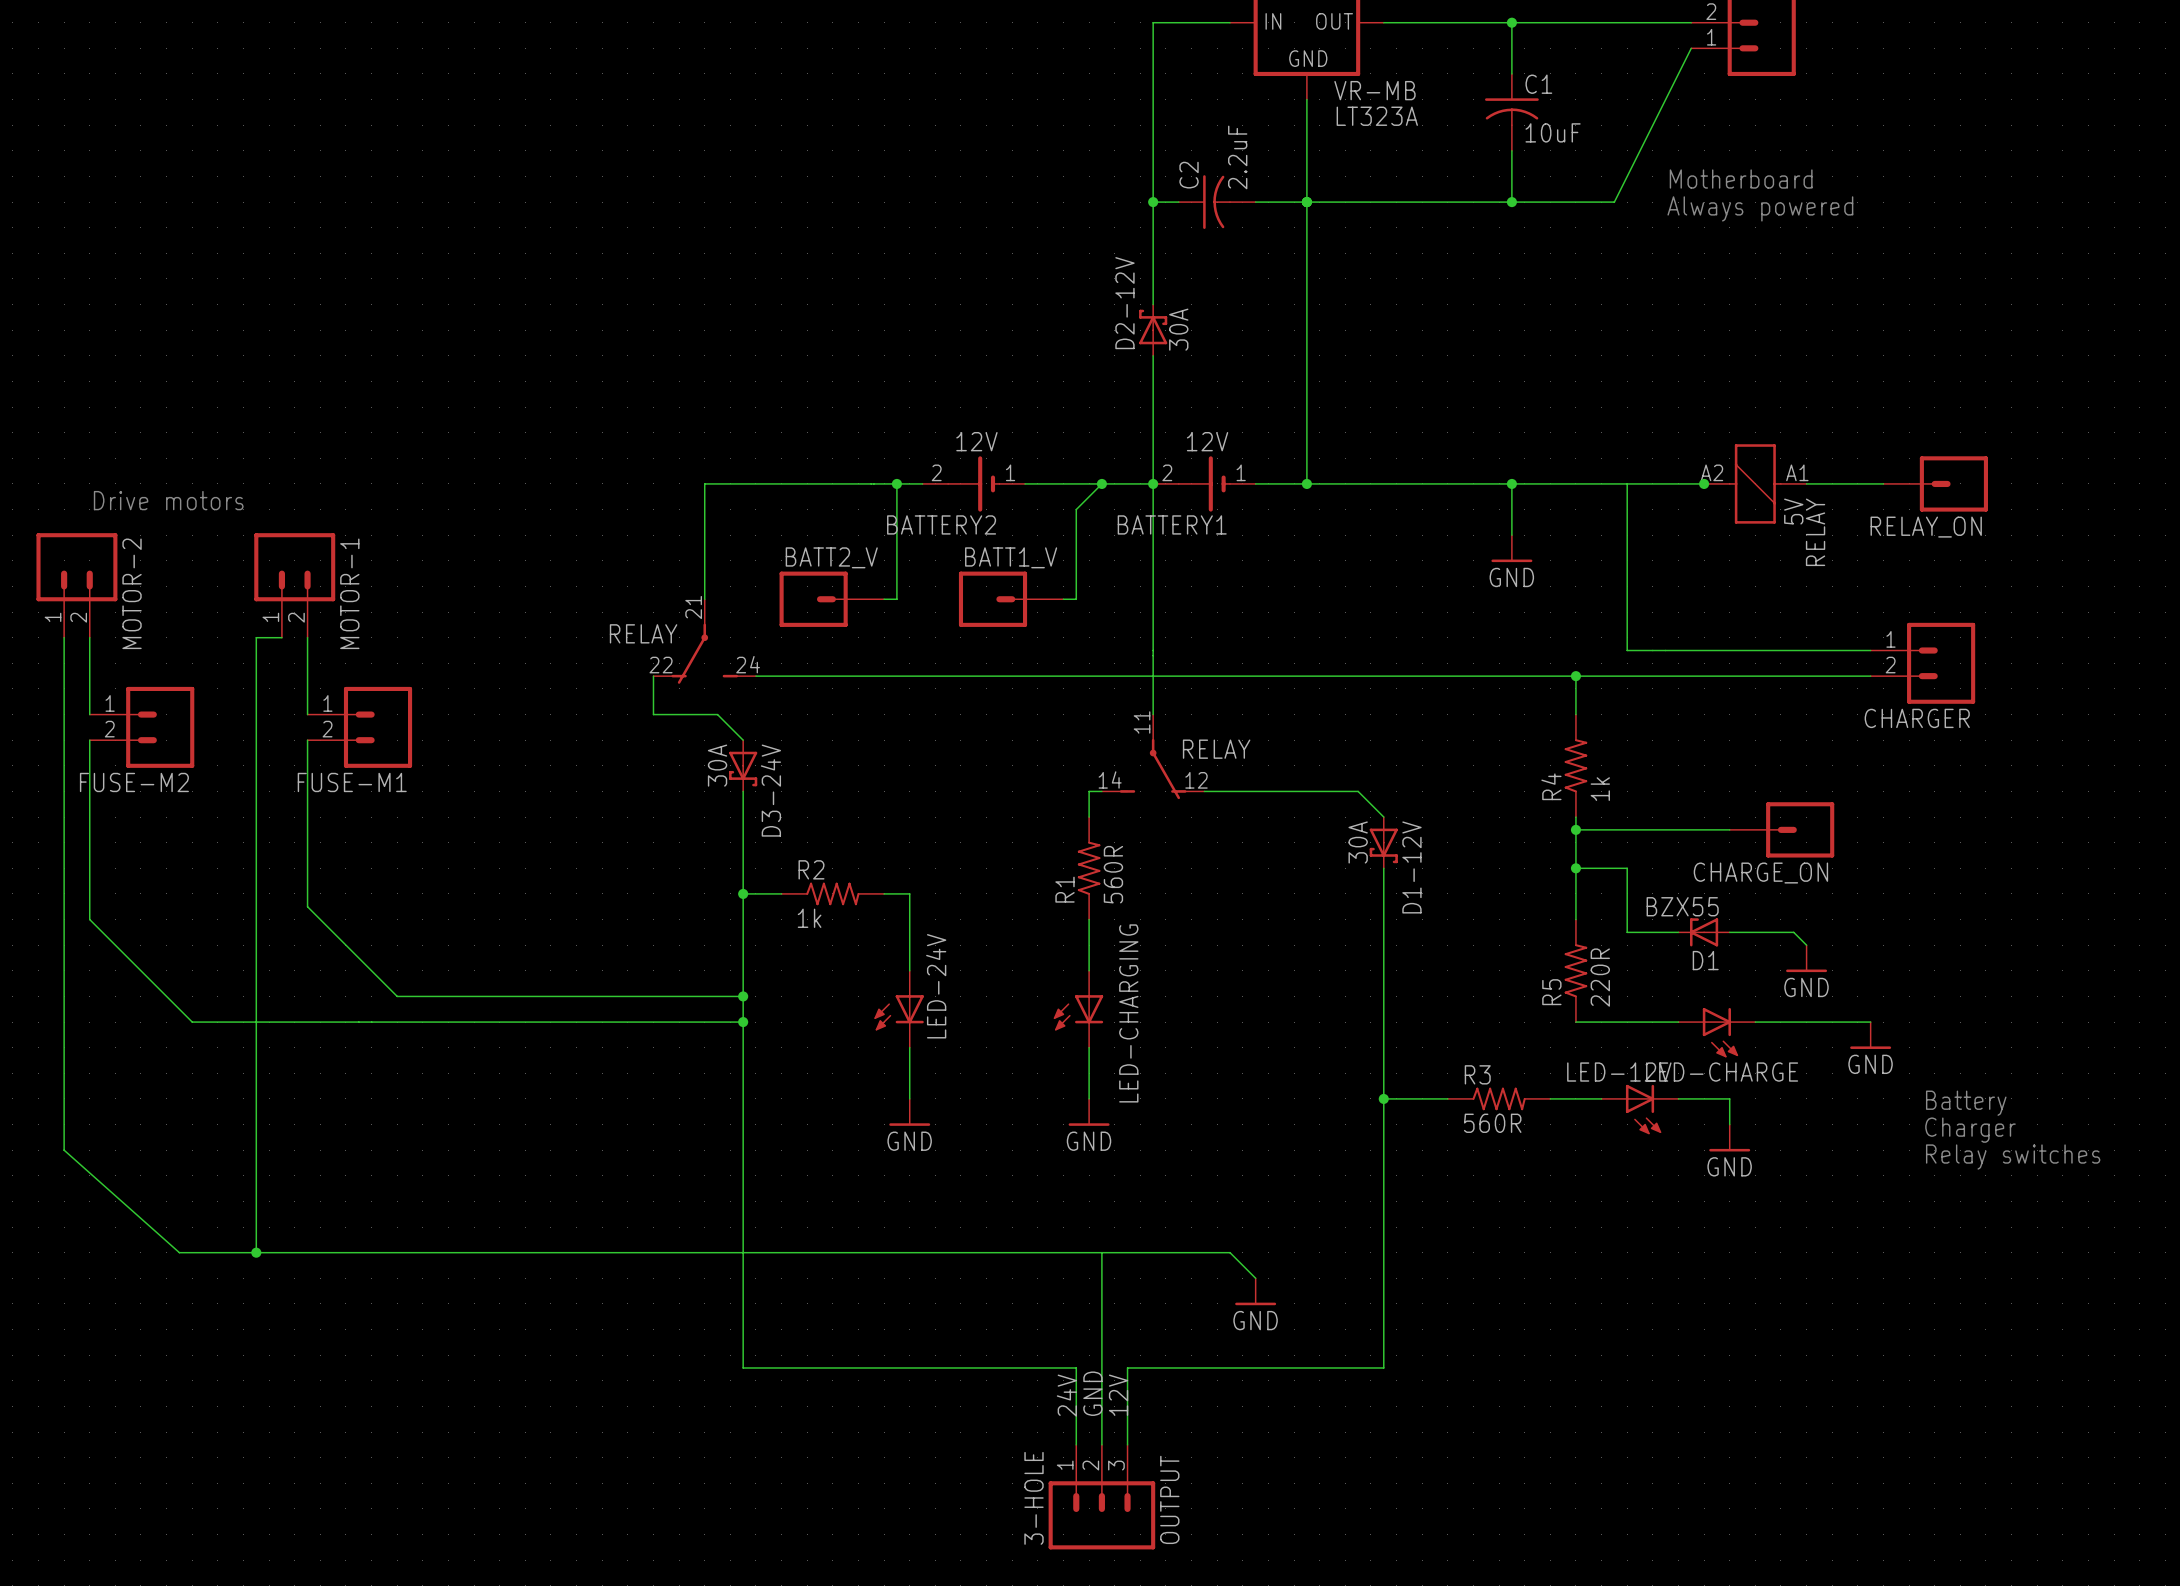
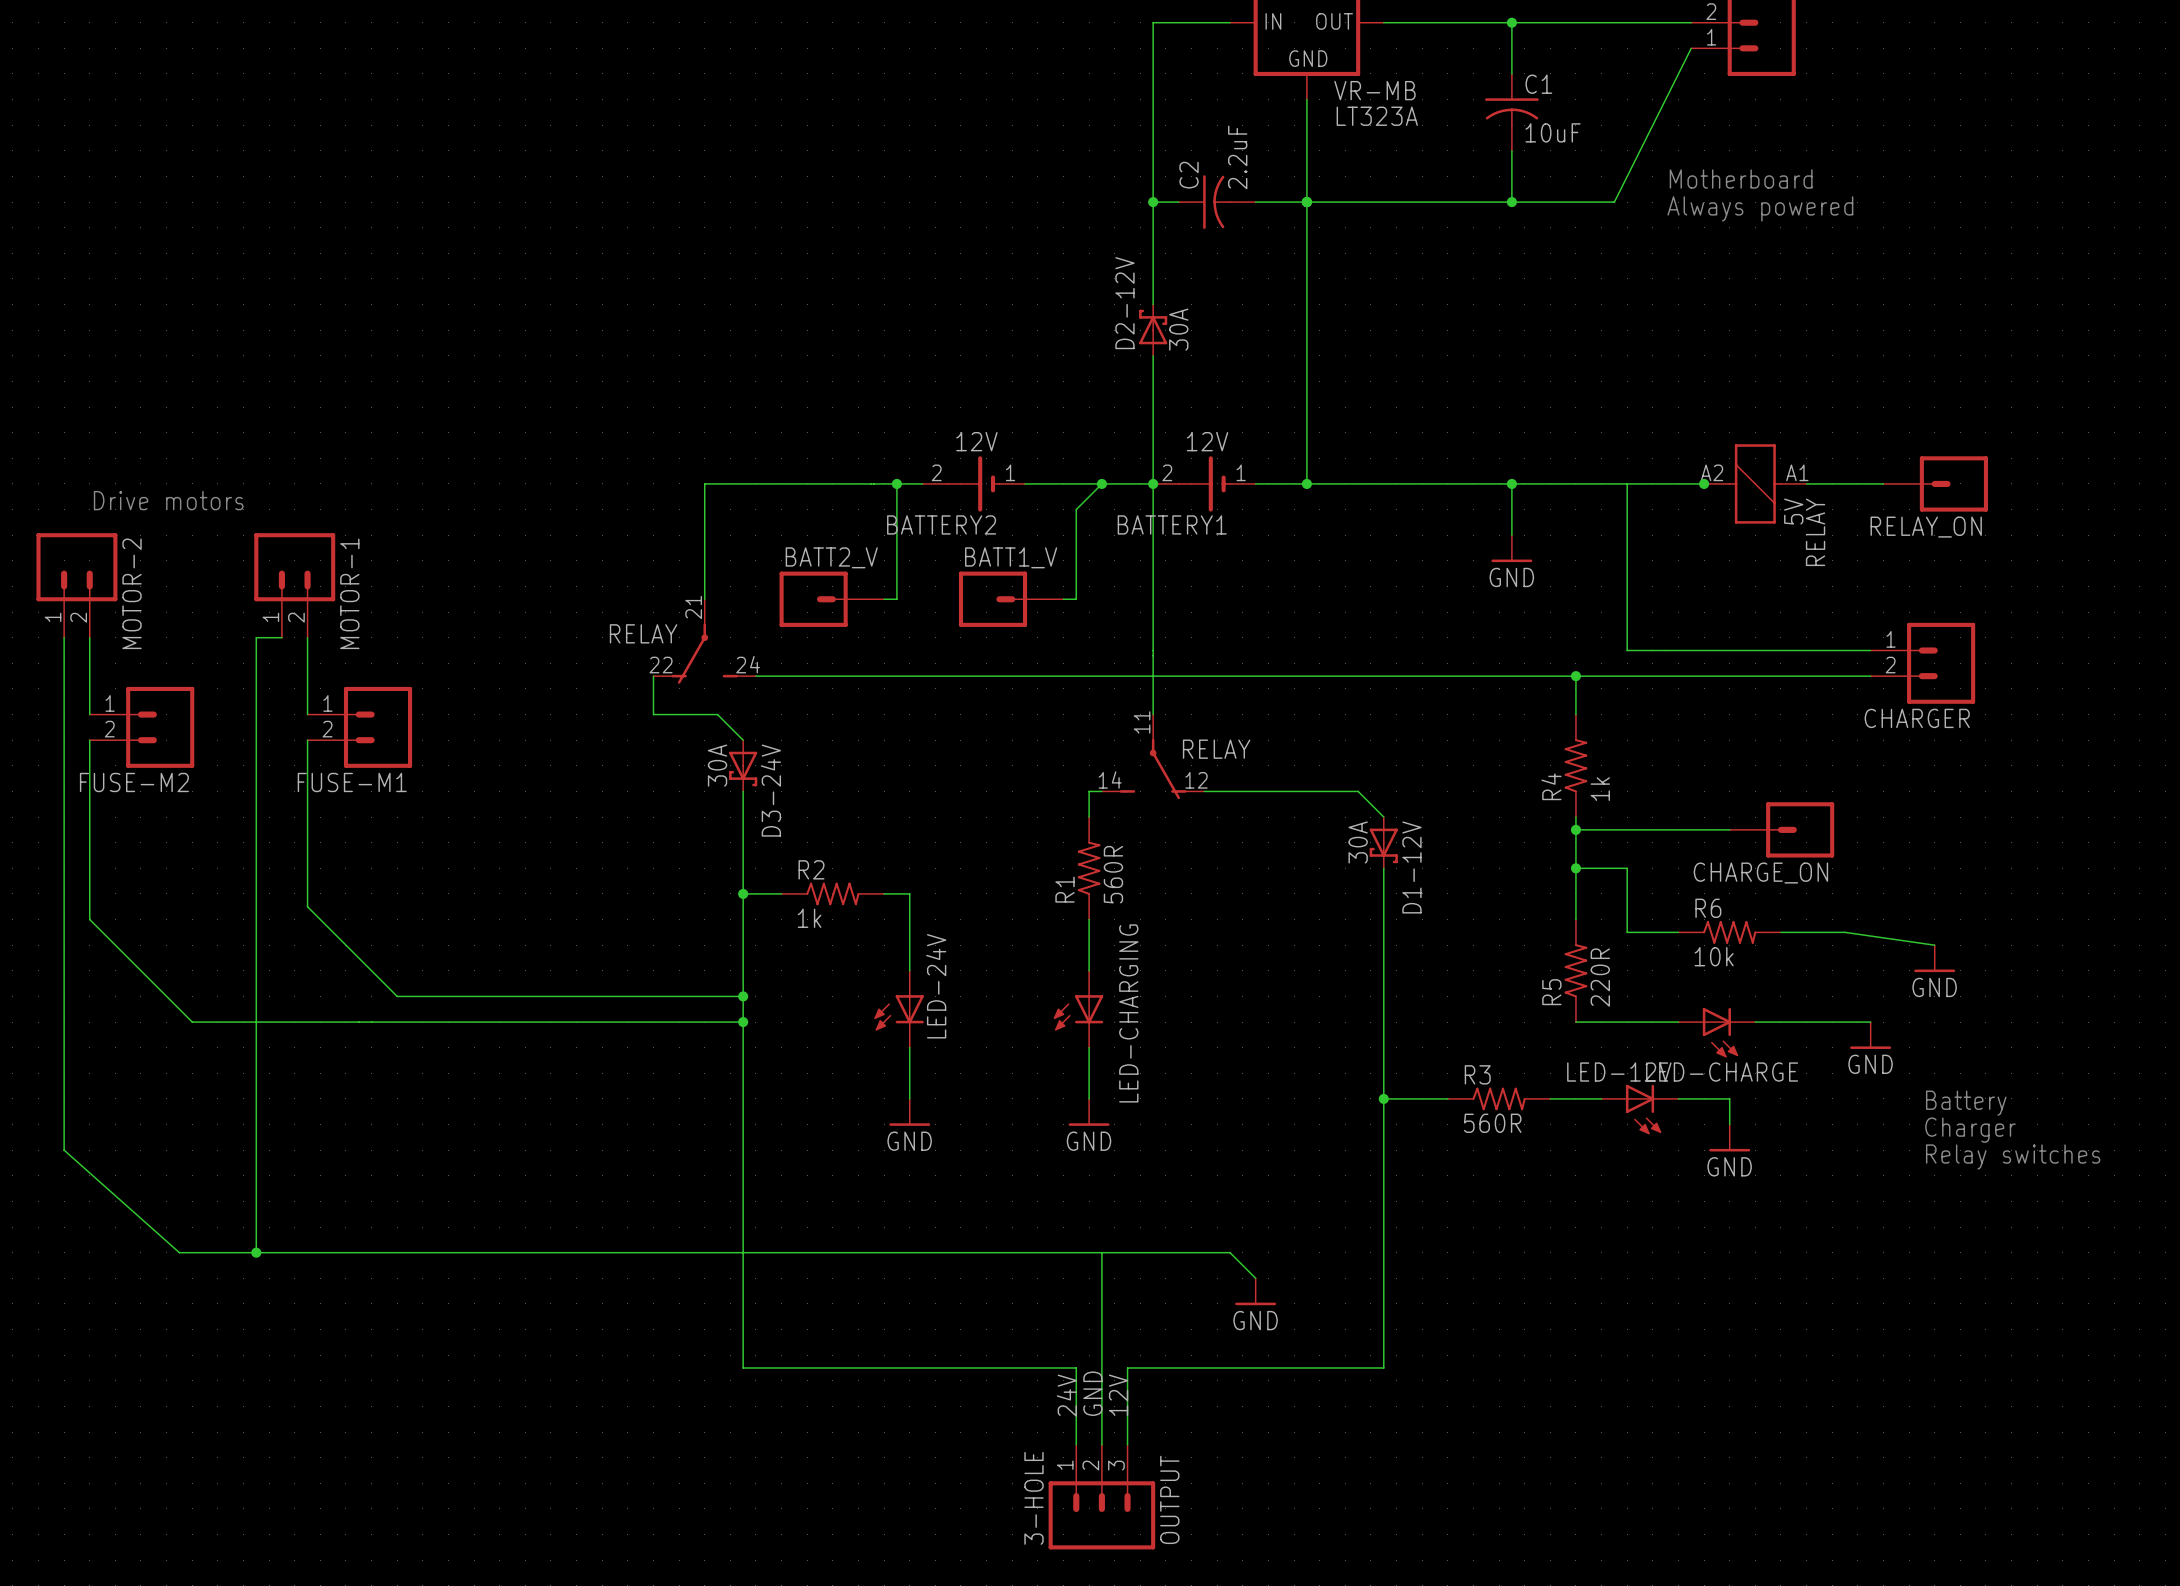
D1: BZX55 (1704, 932) -> none
R6: none -> 10k (1729, 932)
wire: (1793, 932) (1806, 945) -> (1793, 932) (1845, 932) (1934, 945)
power symbol position: GND (1806, 958) -> GND (1934, 958)

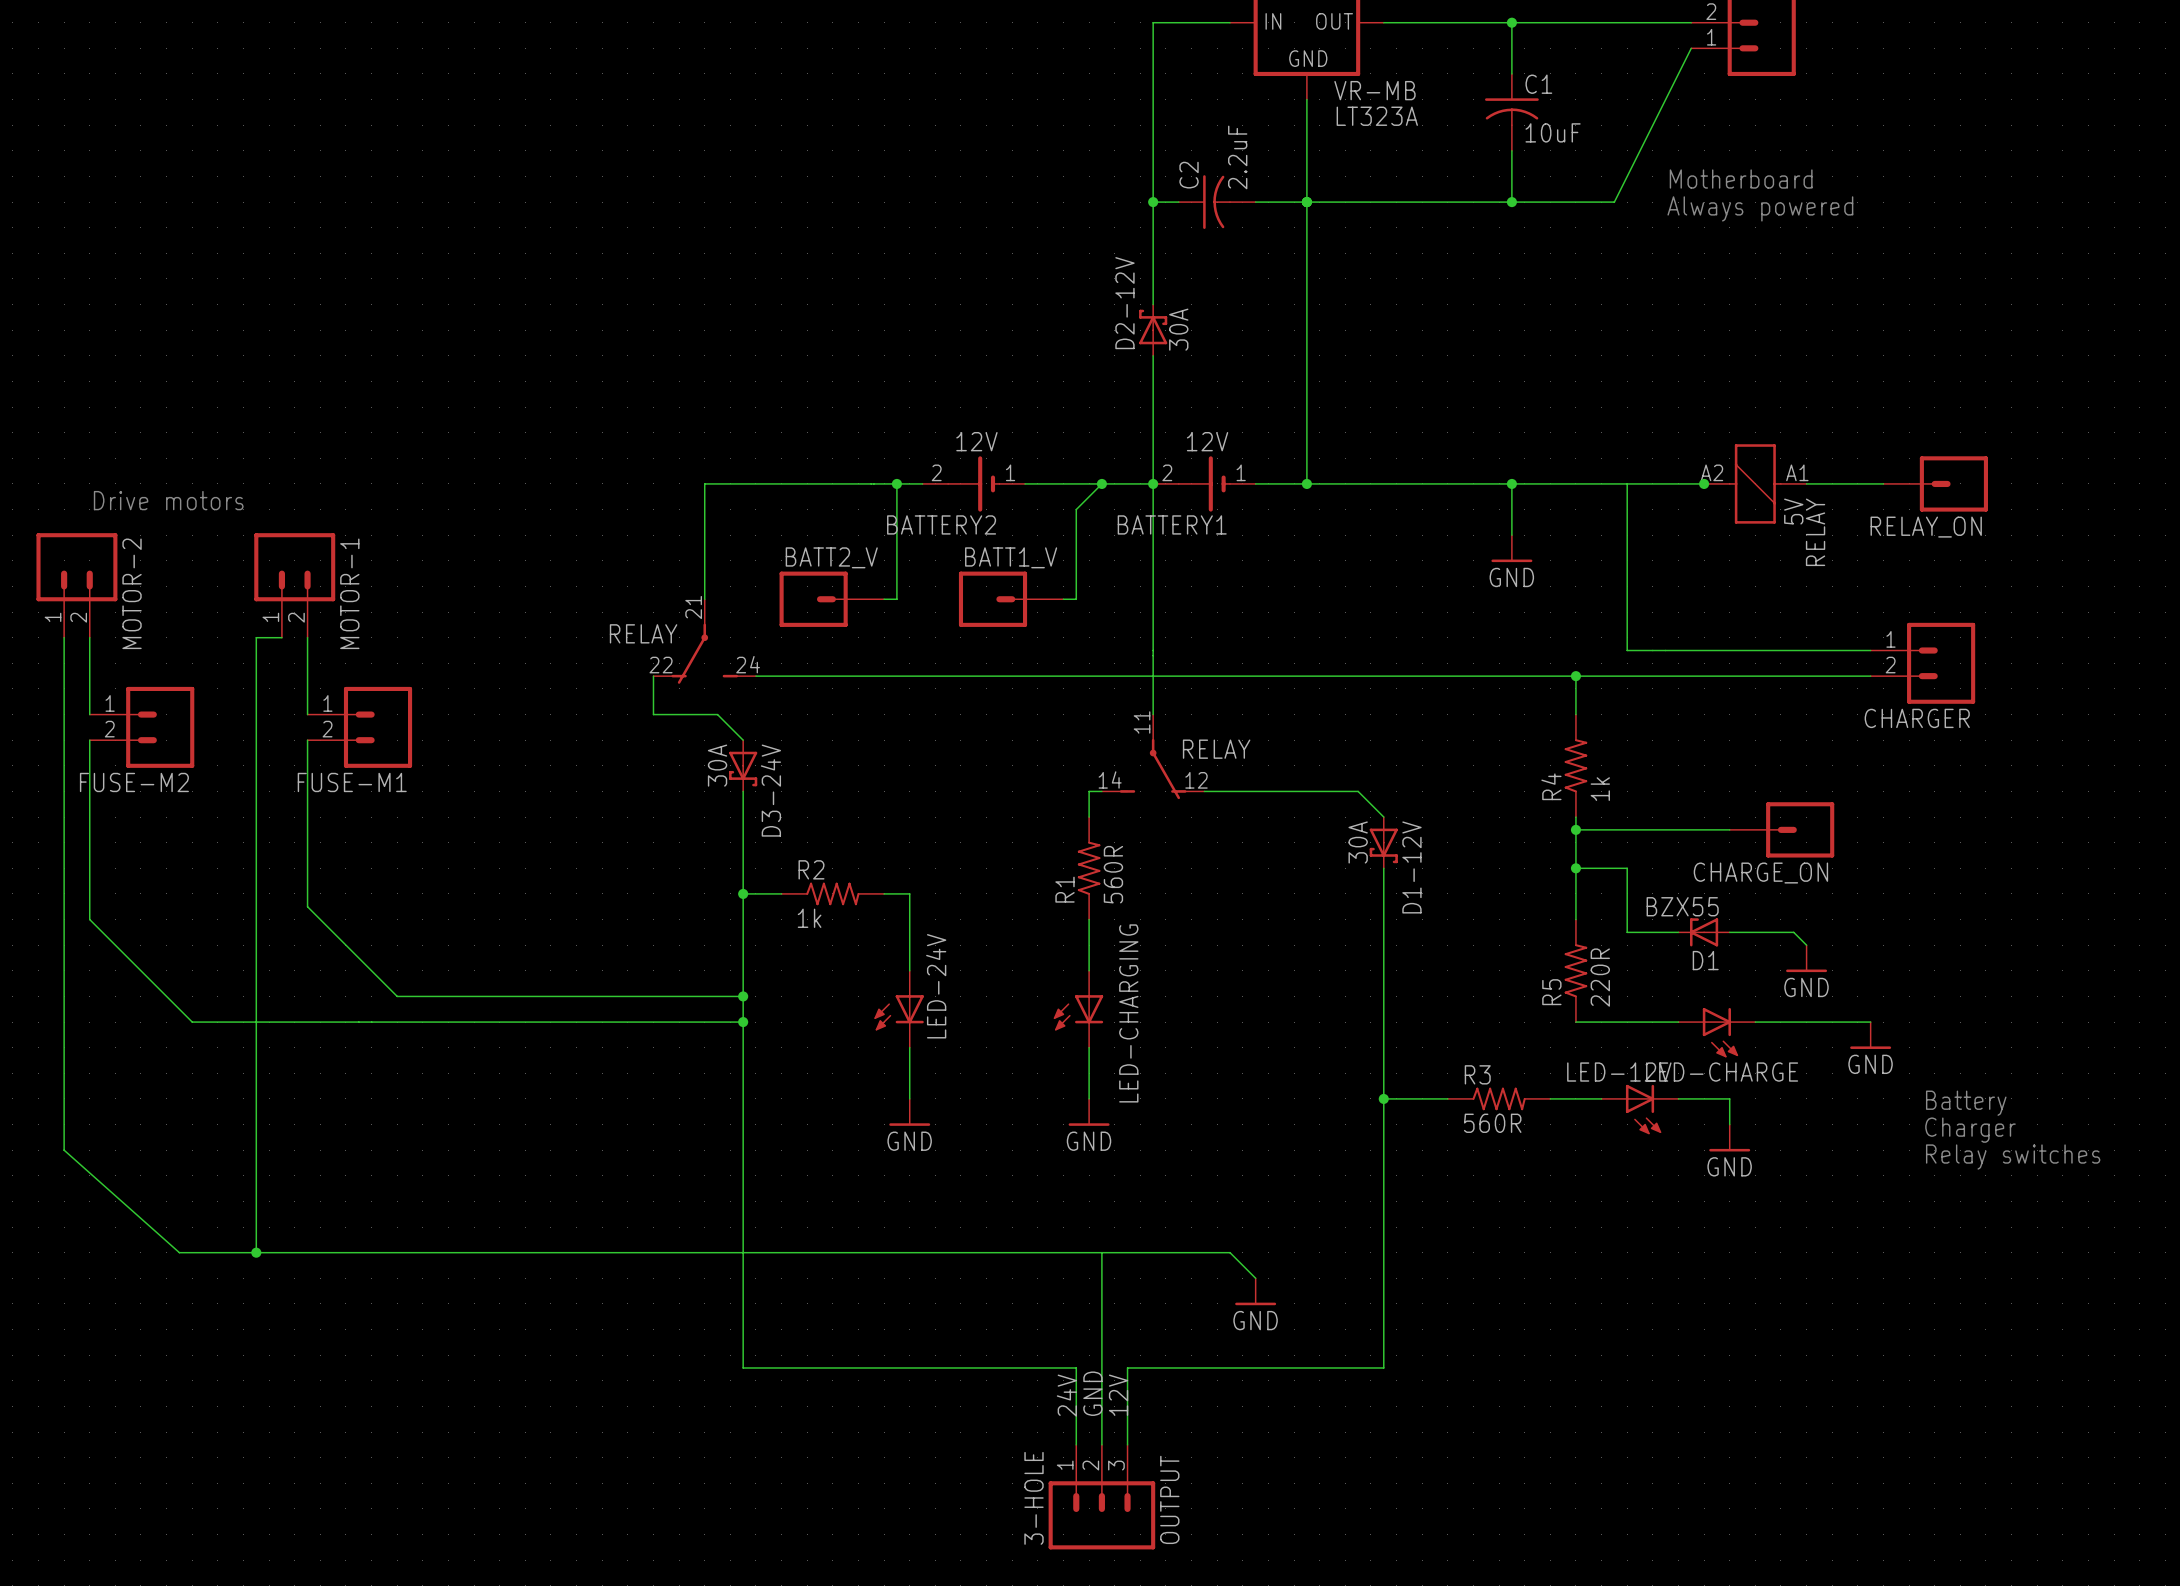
D1: none -> BZX55 (1704, 932)
R6: 10k (1729, 932) -> none
wire: (1793, 932) (1845, 932) (1934, 945) -> (1793, 932) (1806, 945)
power symbol position: GND (1934, 958) -> GND (1806, 958)

